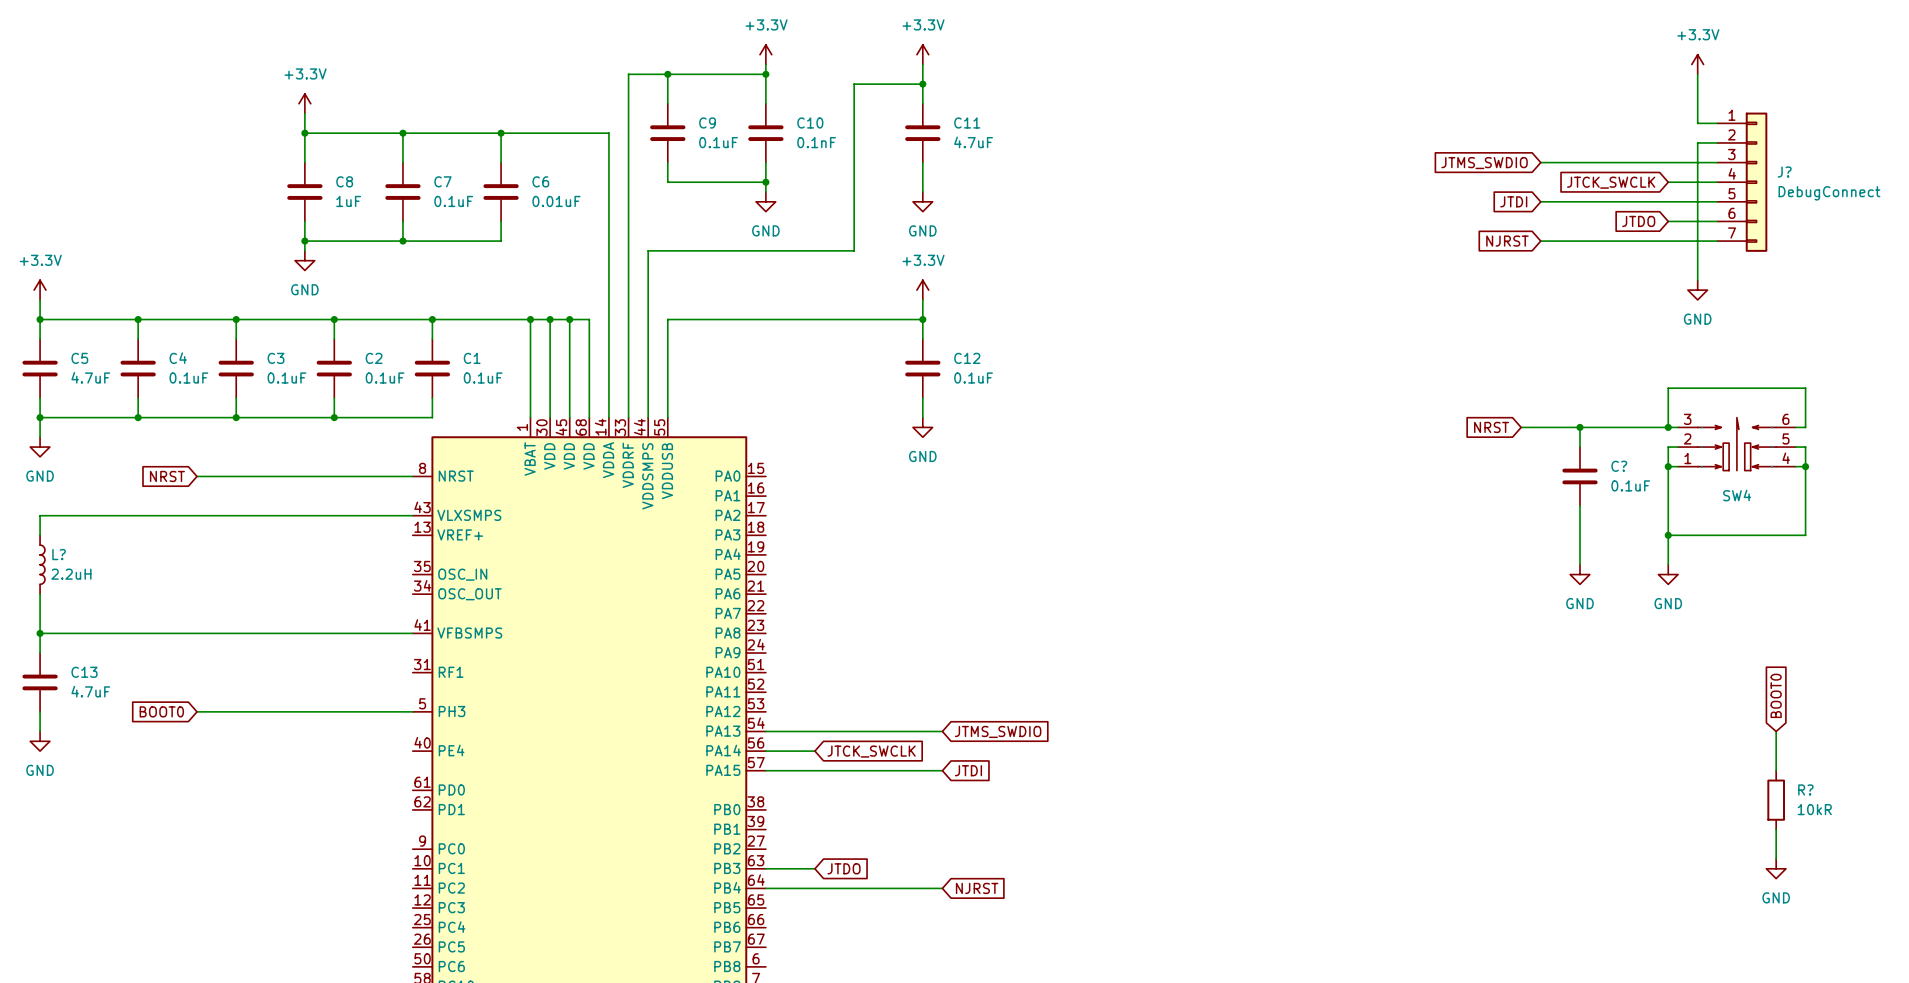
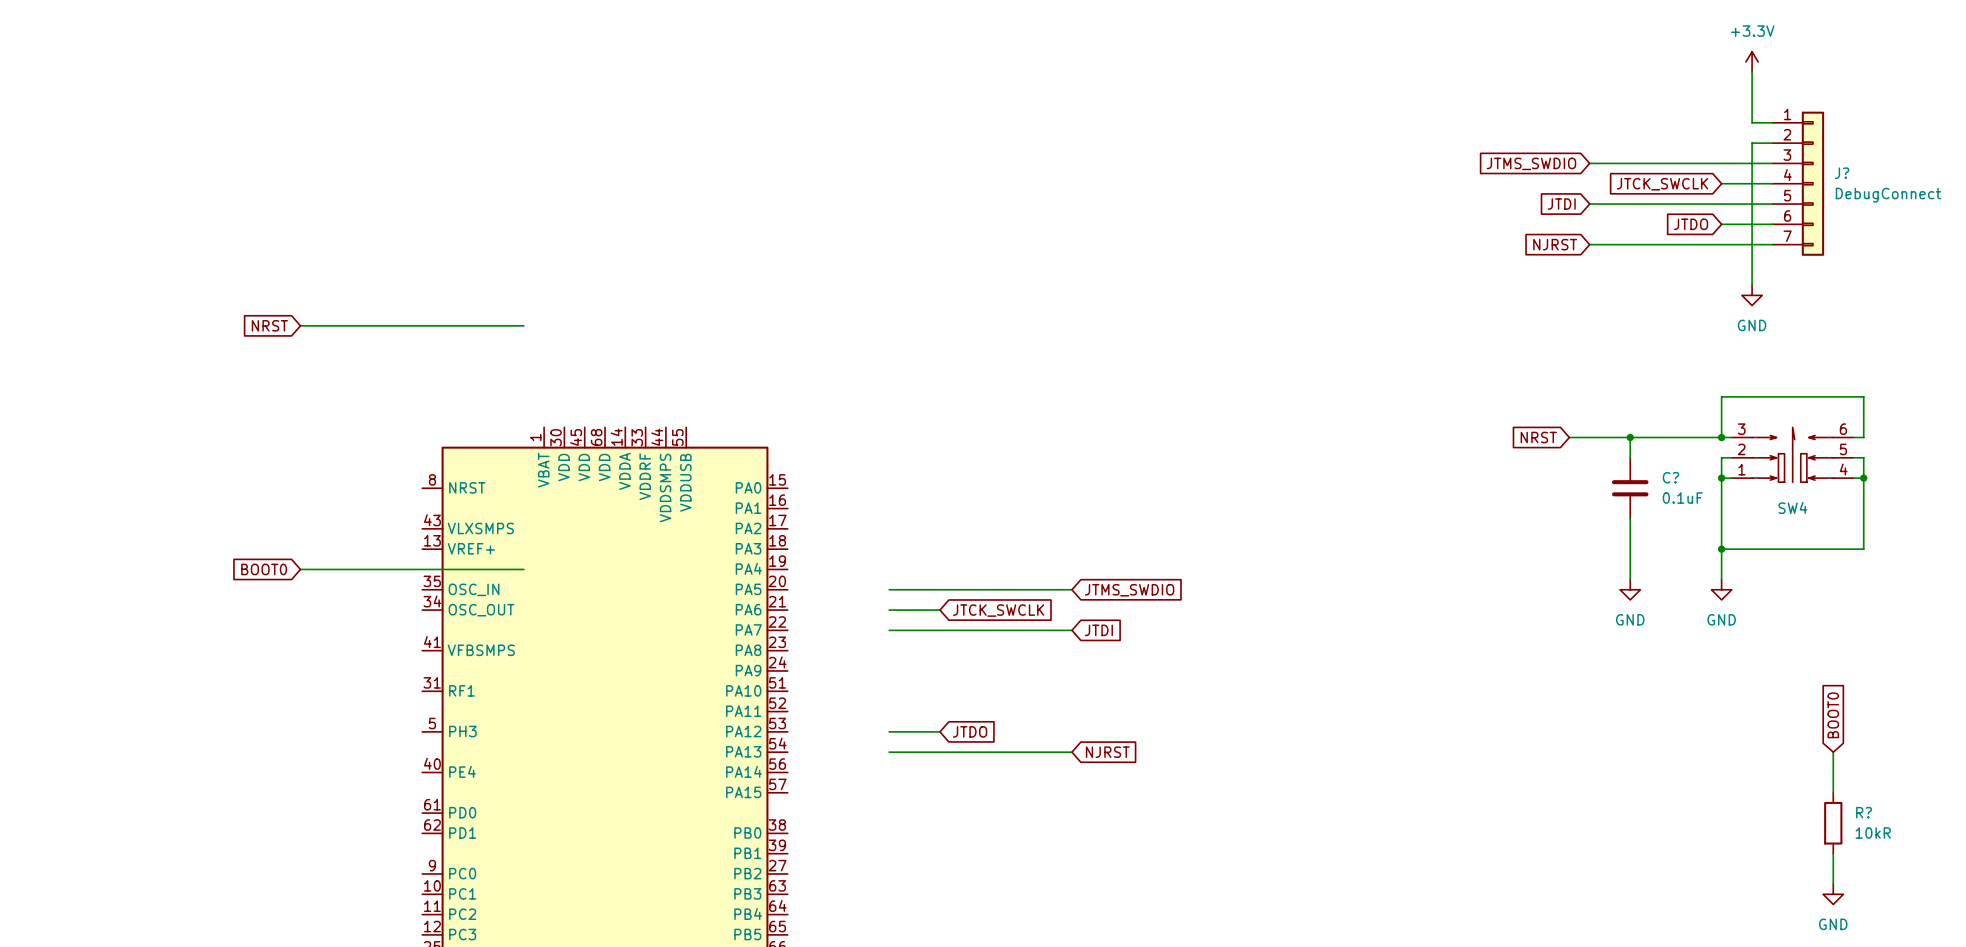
power symbol: +3.3V (765, 54) -> none
power symbol: +3.3V (922, 54) -> none
wire: (765, 64) (765, 103) -> none
wire: (922, 64) (922, 103) -> none
wire: (667, 74) (667, 103) -> none
junction: (667, 74) -> none
wire: (765, 74) (628, 74) (628, 417) -> none
junction: (765, 74) -> none
wire: (922, 84) (854, 84) (854, 250) (648, 250) (648, 417) -> none
junction: (922, 84) -> none
power symbol: +3.3V (304, 103) -> none
wire: (304, 113) (304, 162) -> none
wire: (304, 133) (608, 133) (608, 417) -> none
junction: (304, 133) -> none
wire: (402, 133) (402, 162) -> none
junction: (402, 133) -> none
wire: (501, 133) (501, 162) -> none
junction: (501, 133) -> none
C9: 0.1uF (667, 133) -> none
C10: 0.1nF (765, 133) -> none
C11: 4.7uF (922, 133) -> none
wire: (667, 162) (667, 182) (765, 182) -> none
wire: (765, 162) (765, 192) -> none
wire: (922, 162) (922, 192) -> none
junction: (765, 182) -> none
C8: 1uF (304, 192) -> none
C7: 0.1uF (402, 192) -> none
C6: 0.01uF (501, 192) -> none
power symbol: GND (765, 201) -> none
power symbol: GND (922, 201) -> none
wire: (304, 221) (304, 250) -> none
wire: (402, 221) (402, 241) -> none
wire: (501, 221) (501, 241) (304, 241) -> none
junction: (304, 241) -> none
junction: (402, 241) -> none
power symbol: GND (304, 260) -> none
power symbol: +3.3V (40, 290) -> none
power symbol: +3.3V (922, 290) -> none
wire: (40, 299) (40, 339) -> none
wire: (922, 299) (922, 339) -> none
wire: (40, 319) (295, 319) -> none
junction: (40, 319) -> none
wire: (138, 319) (138, 339) -> none
junction: (138, 319) -> none
wire: (236, 319) (236, 339) -> none
junction: (236, 319) -> none
wire: (334, 319) (334, 339) -> none
junction: (334, 319) -> none
wire: (432, 319) (432, 339) -> none
junction: (432, 319) -> none
wire: (510, 319) (589, 319) (589, 417) -> none
wire: (530, 319) (530, 417) -> none
junction: (530, 319) -> none
wire: (550, 319) (550, 417) -> none
junction: (550, 319) -> none
wire: (569, 319) (569, 417) -> none
junction: (569, 319) -> none
wire: (922, 319) (667, 319) (667, 417) -> none
junction: (922, 319) -> none
C5: 4.7uF (40, 368) -> none
C4: 0.1uF (138, 368) -> none
C3: 0.1uF (236, 368) -> none
C2: 0.1uF (334, 368) -> none
C1: 0.1uF (432, 368) -> none
C12: 0.1uF (922, 368) -> none
wire: (40, 398) (40, 437) -> none
wire: (138, 398) (138, 417) -> none
wire: (236, 398) (236, 417) -> none
wire: (334, 398) (334, 417) -> none
wire: (432, 398) (432, 417) (40, 417) -> none
wire: (922, 398) (922, 417) -> none
junction: (40, 417) -> none
junction: (138, 417) -> none
junction: (236, 417) -> none
junction: (334, 417) -> none
power symbol: GND (922, 427) -> none
power symbol: GND (40, 447) -> none
global label position: NRST (167, 476) -> NRST (269, 325)
wire: (196, 476) (412, 476) -> none
wire: (412, 515) (40, 515) (40, 535) -> none
L?: 2.2uH (42, 564) -> none
wire: none -> (889, 589) (1071, 589)
wire: (40, 594) (40, 653) -> none
wire: (40, 633) (412, 633) -> none
junction: (40, 633) -> none
C13: 4.7uF (40, 682) -> none
wire: (40, 711) (40, 731) -> none
global label position: BOOT0 (161, 711) -> BOOT0 (264, 569)
wire: (196, 711) (412, 711) -> (300, 569) (523, 569)
wire: (765, 731) (863, 731) -> (970, 752) (1071, 752)
global label position: JTMS_SWDIO (998, 731) -> JTMS_SWDIO (1129, 590)
power symbol: GND (40, 741) -> none
wire: (765, 751) (814, 751) -> (889, 610) (939, 610)
global label position: JTCK_SWCLK (871, 751) -> JTCK_SWCLK (998, 610)
wire: (765, 770) (942, 770) -> (889, 630) (1071, 630)
global label position: JTDI (968, 770) -> JTDI (1098, 630)
wire: (765, 868) (814, 868) -> (889, 731) (939, 731)
global label position: JTDO (844, 868) -> JTDO (970, 731)
wire: (765, 888) (942, 888) -> none
global label position: NJRST (977, 888) -> NJRST (1107, 752)

